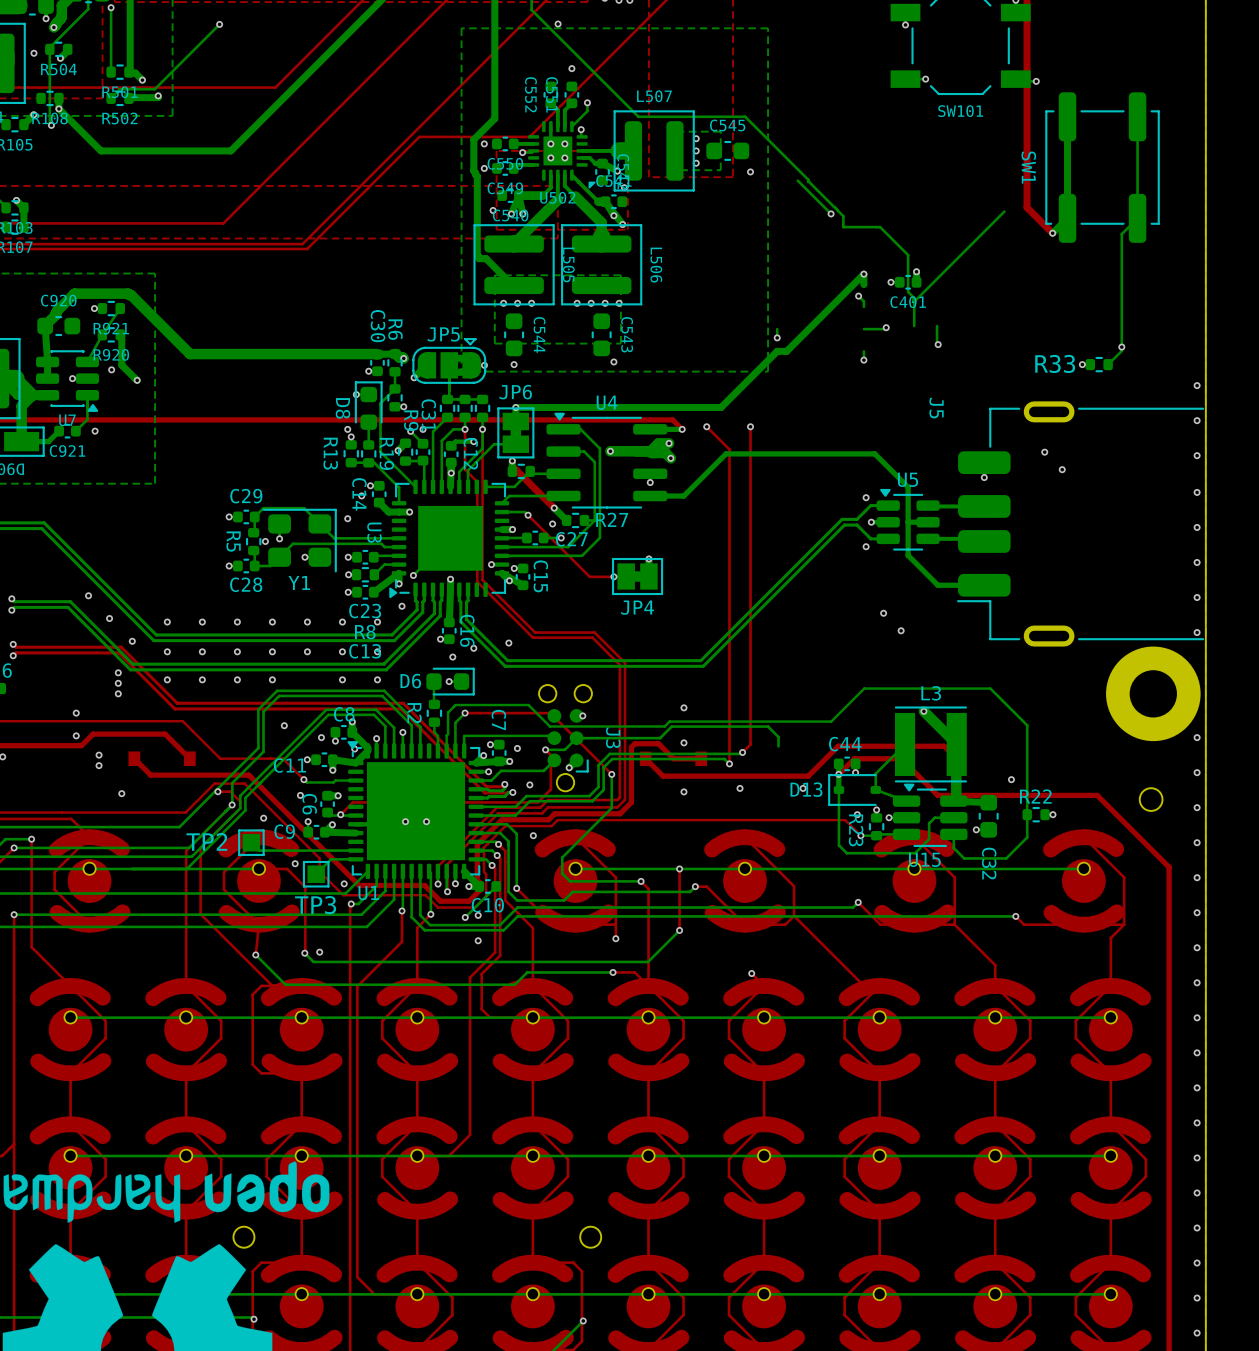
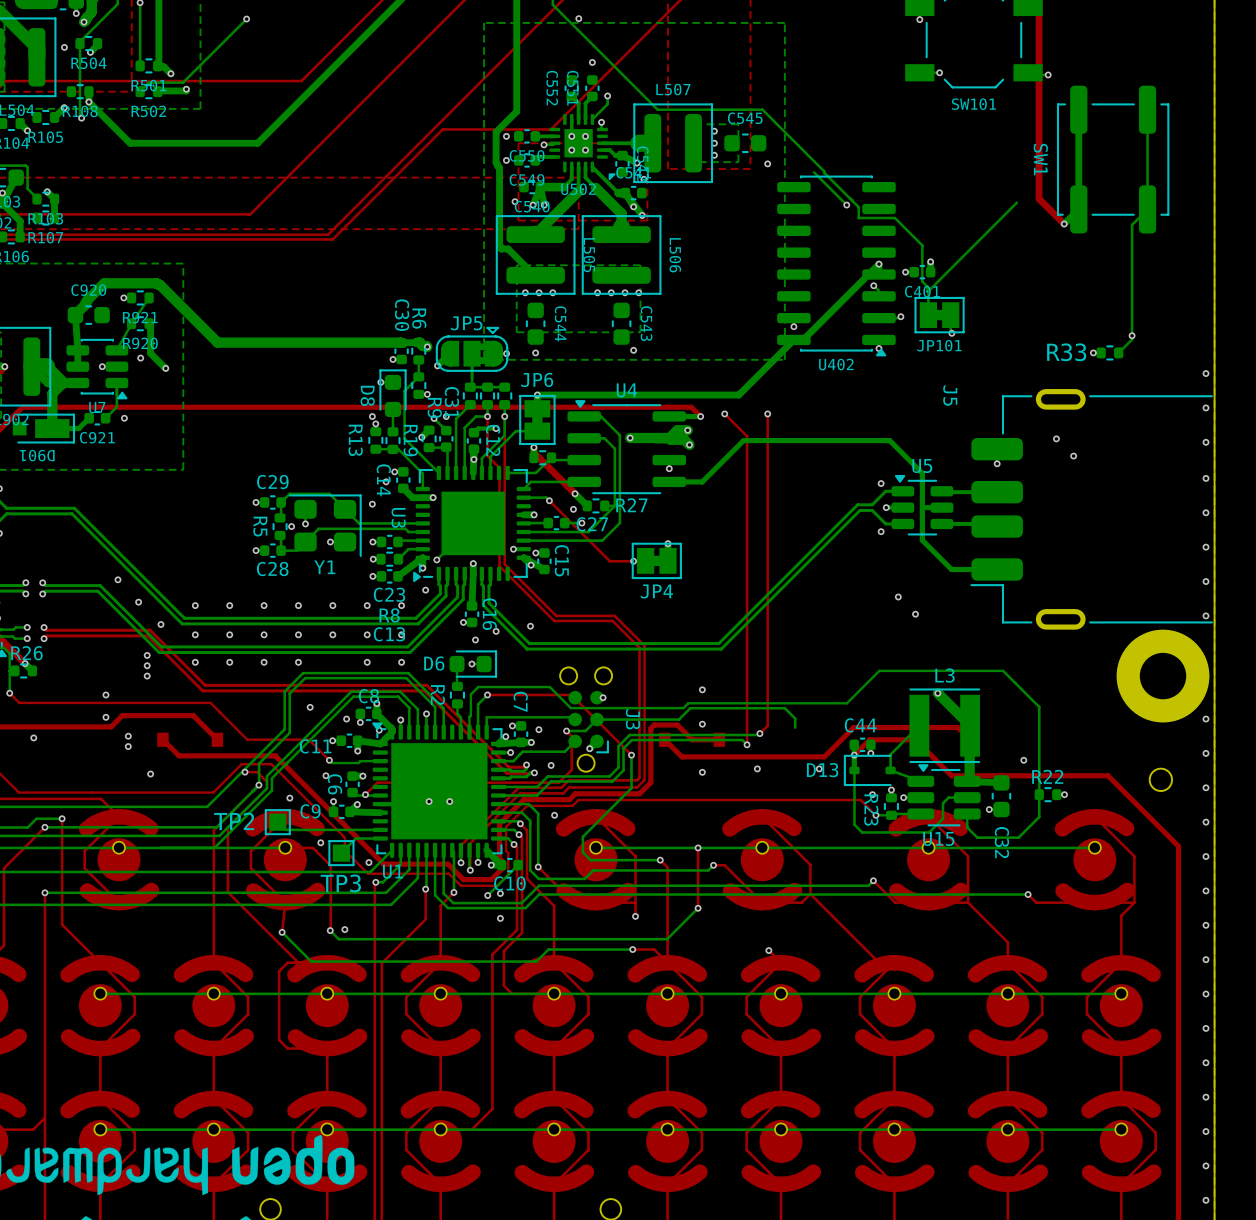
U402: none -> (836, 265)
JP101: none -> (939, 315)

